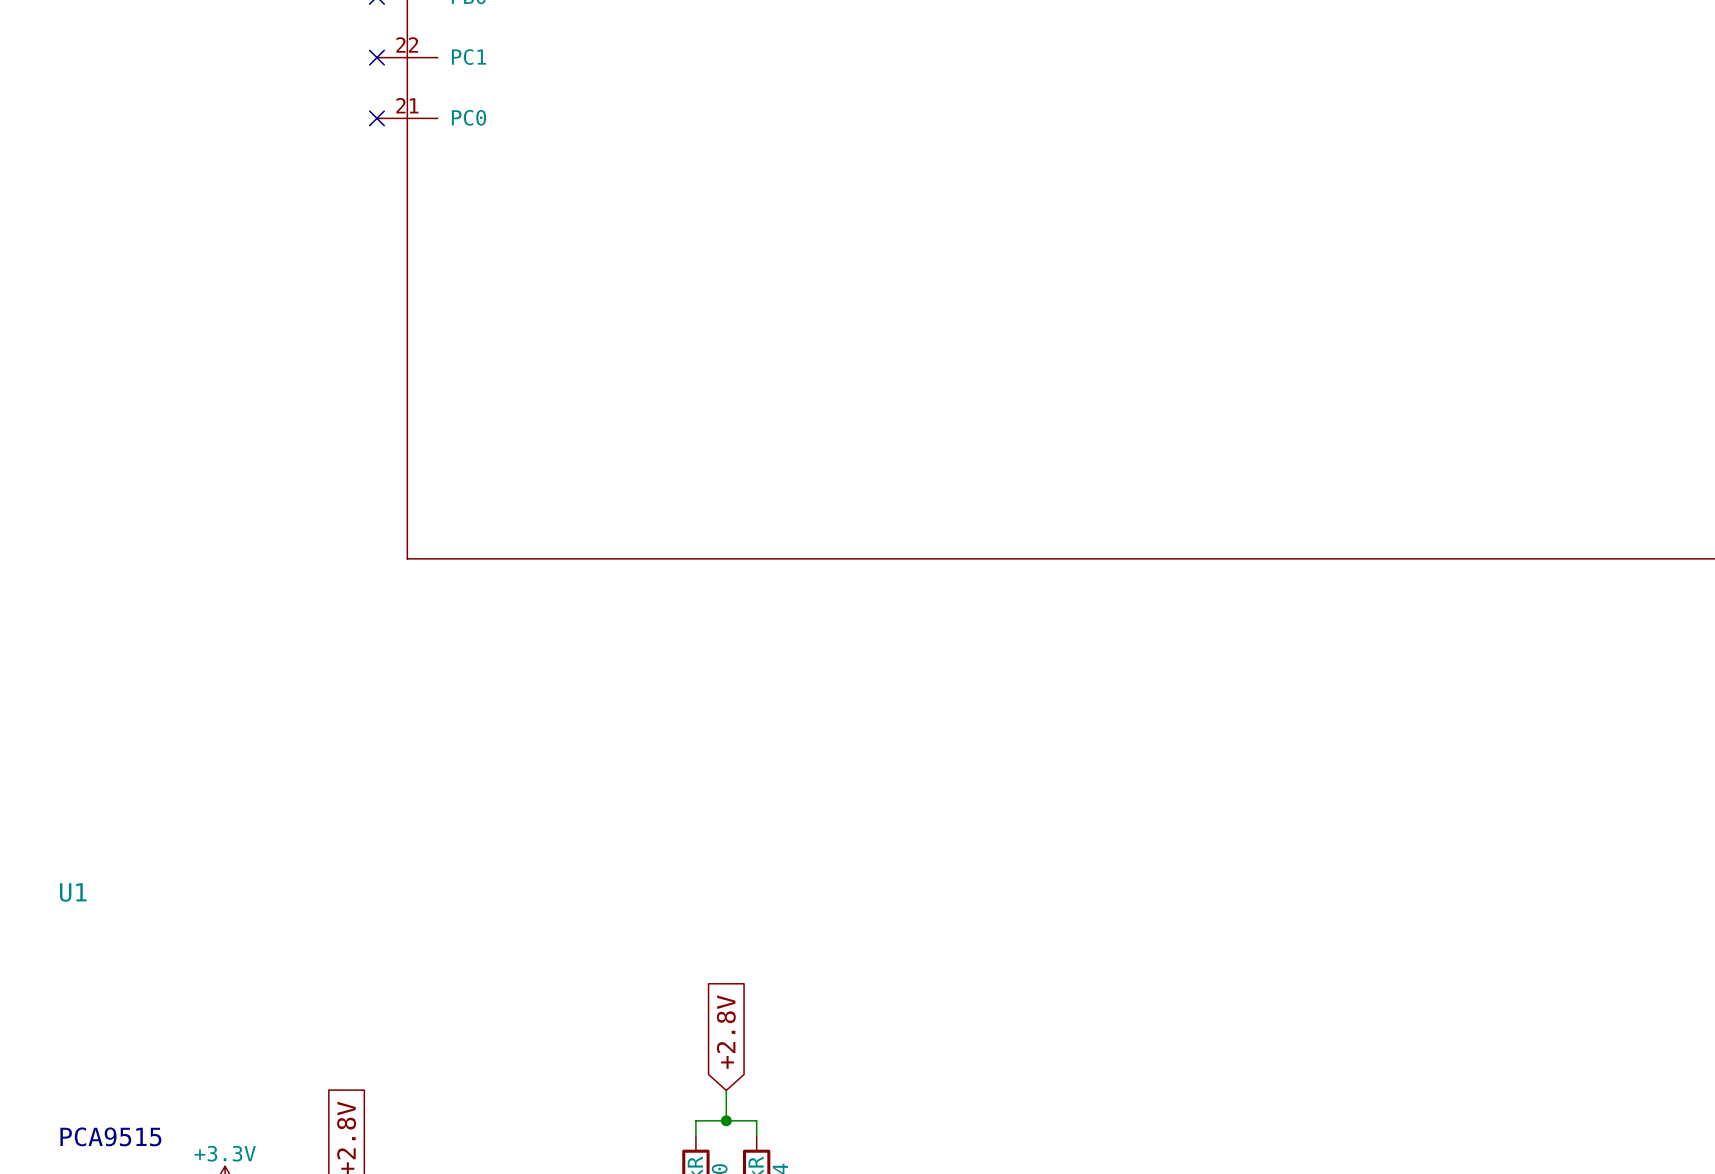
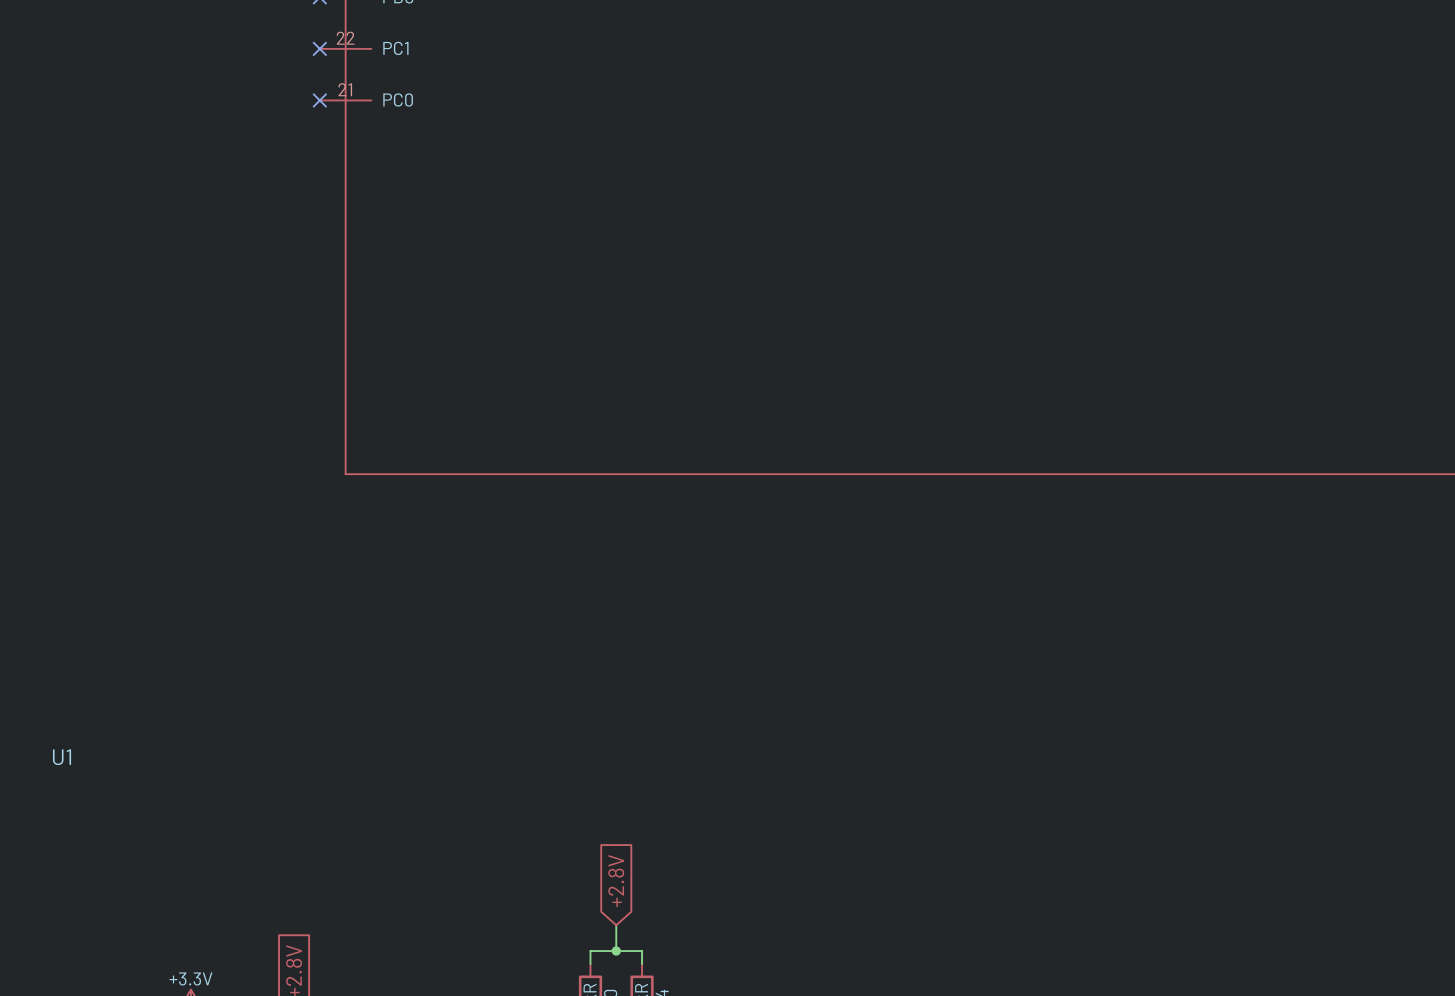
text: PCA9515 (110, 1136) -> none

